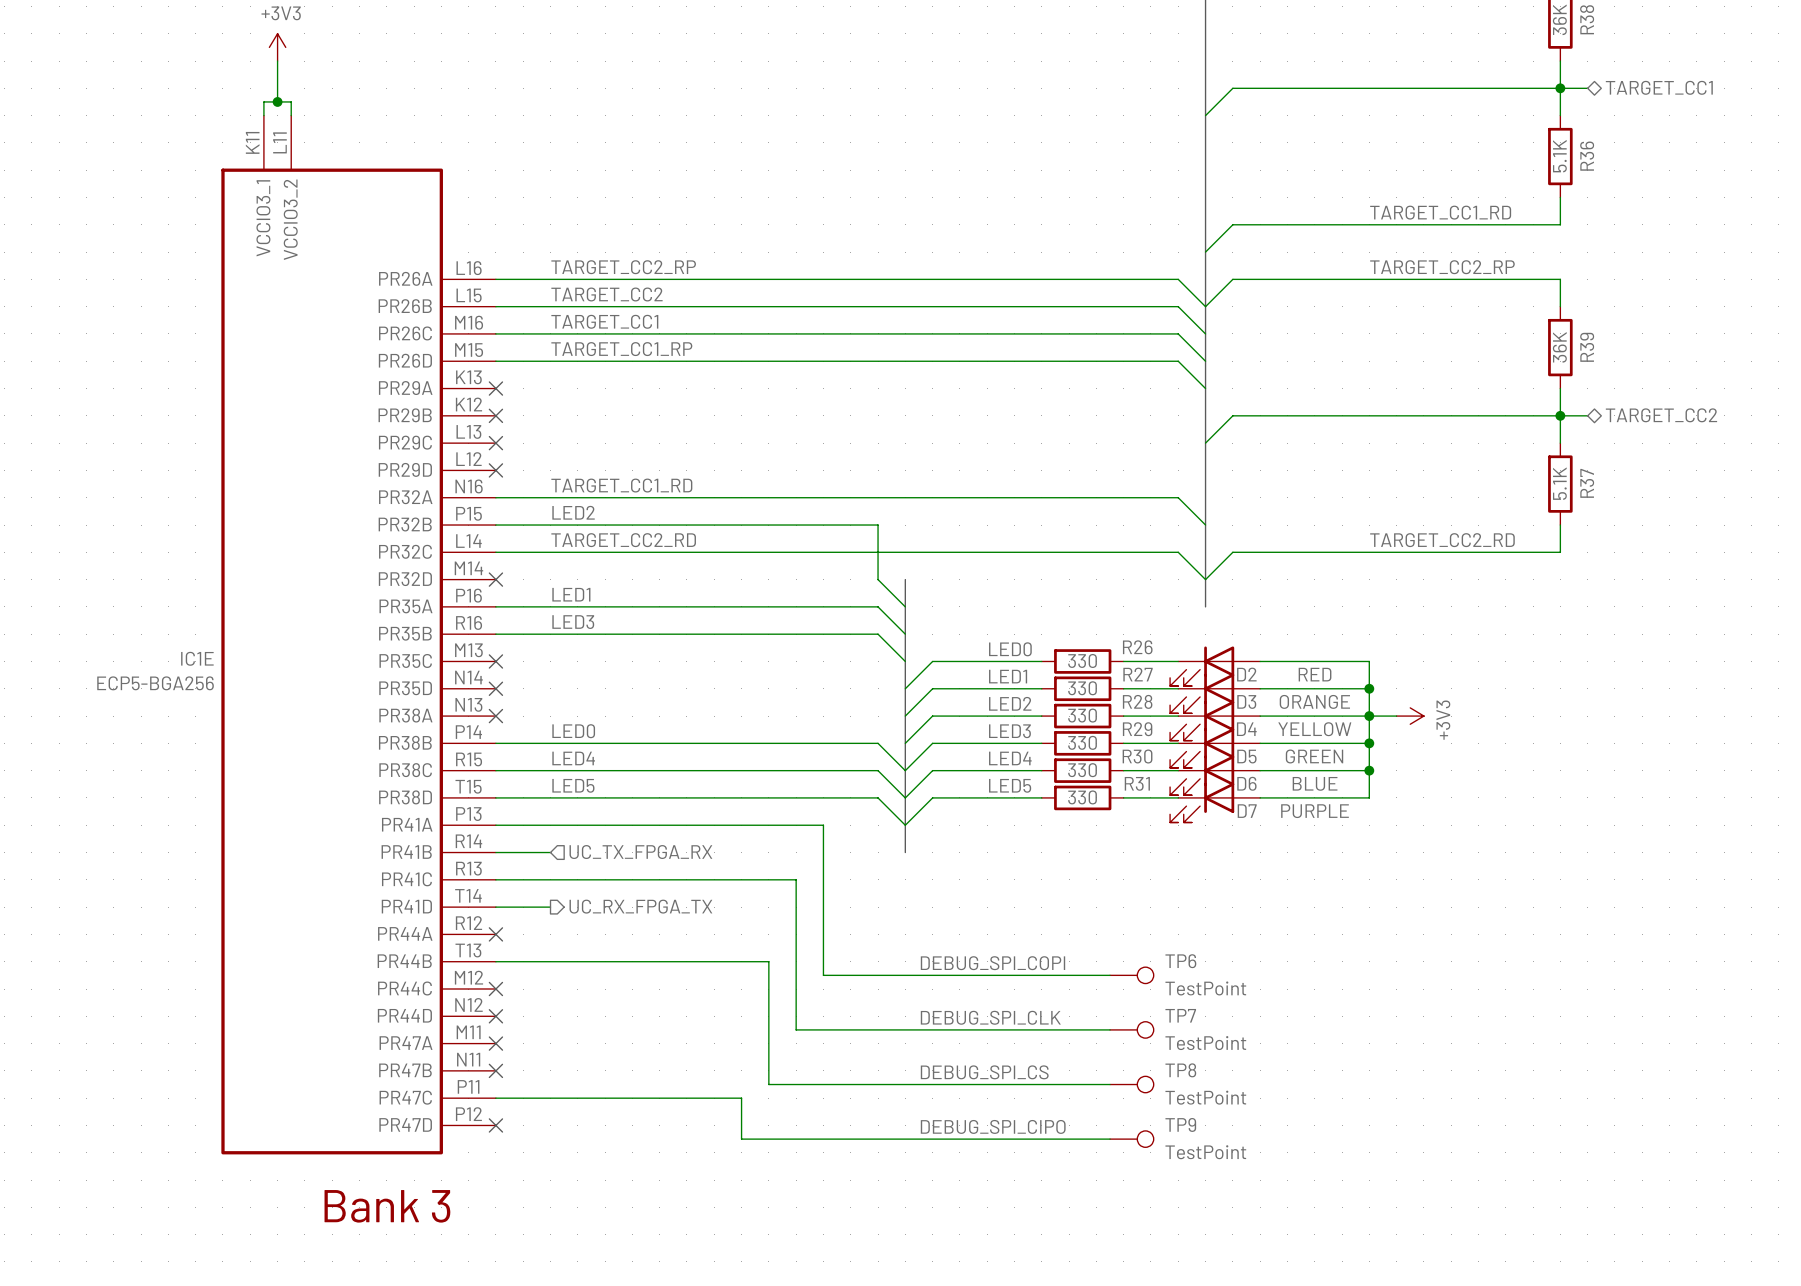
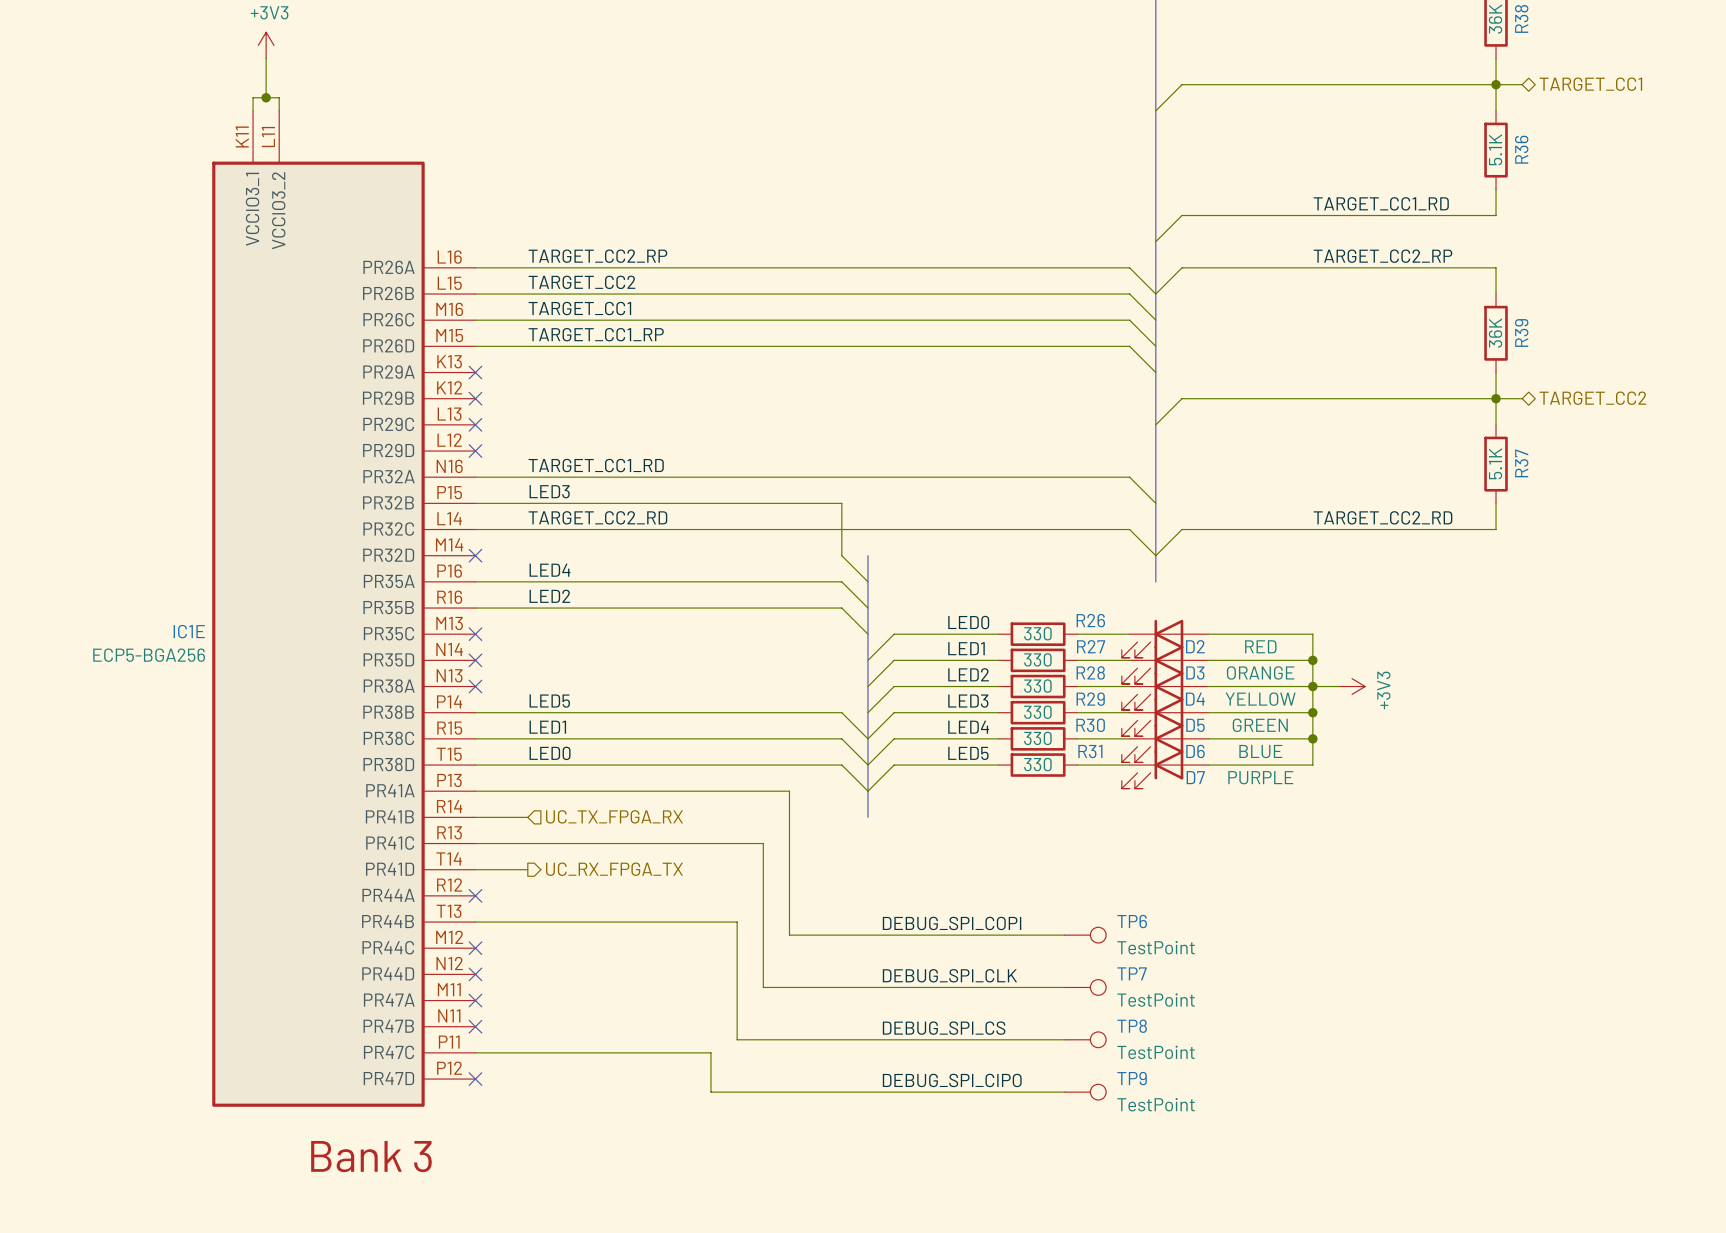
label: LED2 (573, 512) -> LED3 (549, 491)
label: LED1 (571, 594) -> LED4 (550, 570)
label: LED3 (573, 622) -> LED2 (549, 596)
label: LED0 (573, 731) -> LED5 (549, 701)
label: LED4 (573, 758) -> LED1 (547, 727)
label: LED5 (573, 785) -> LED0 (550, 753)

